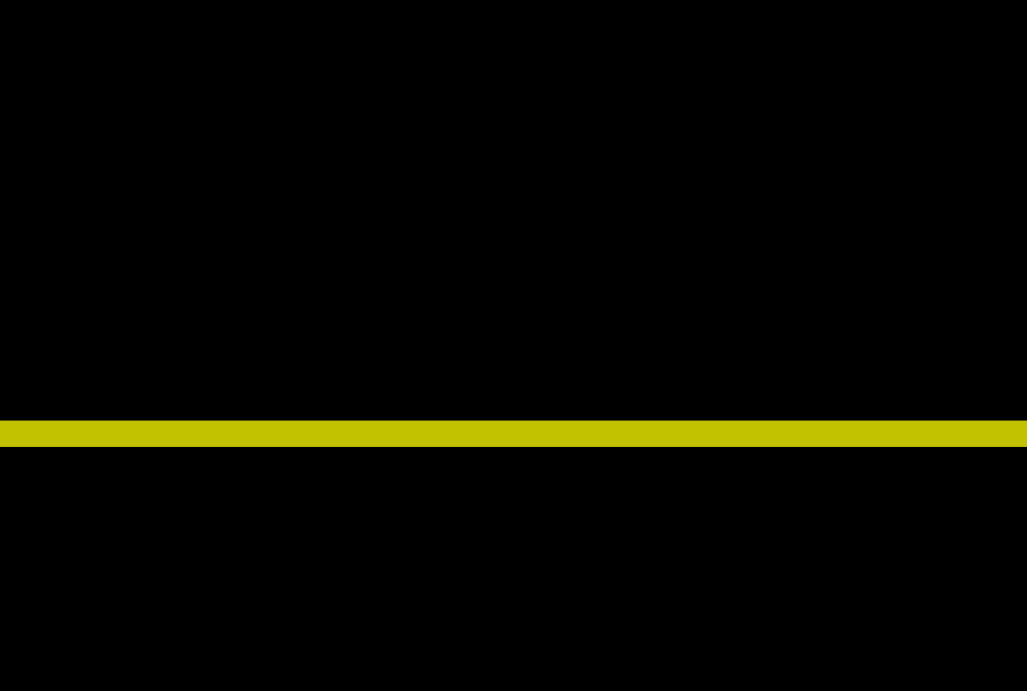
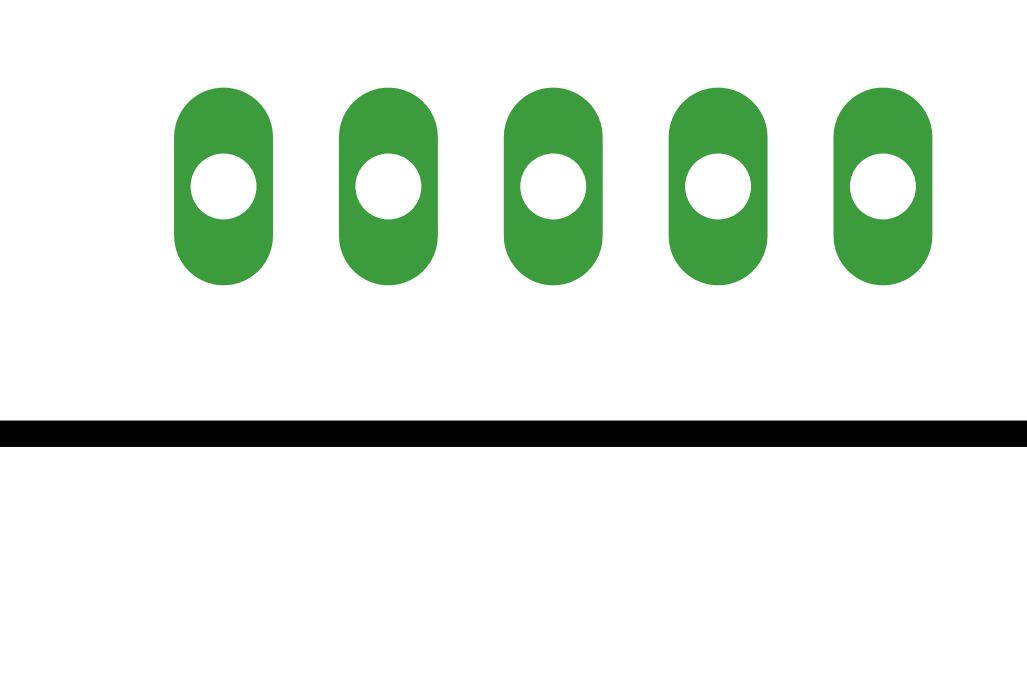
part: none -> (553, 186)

